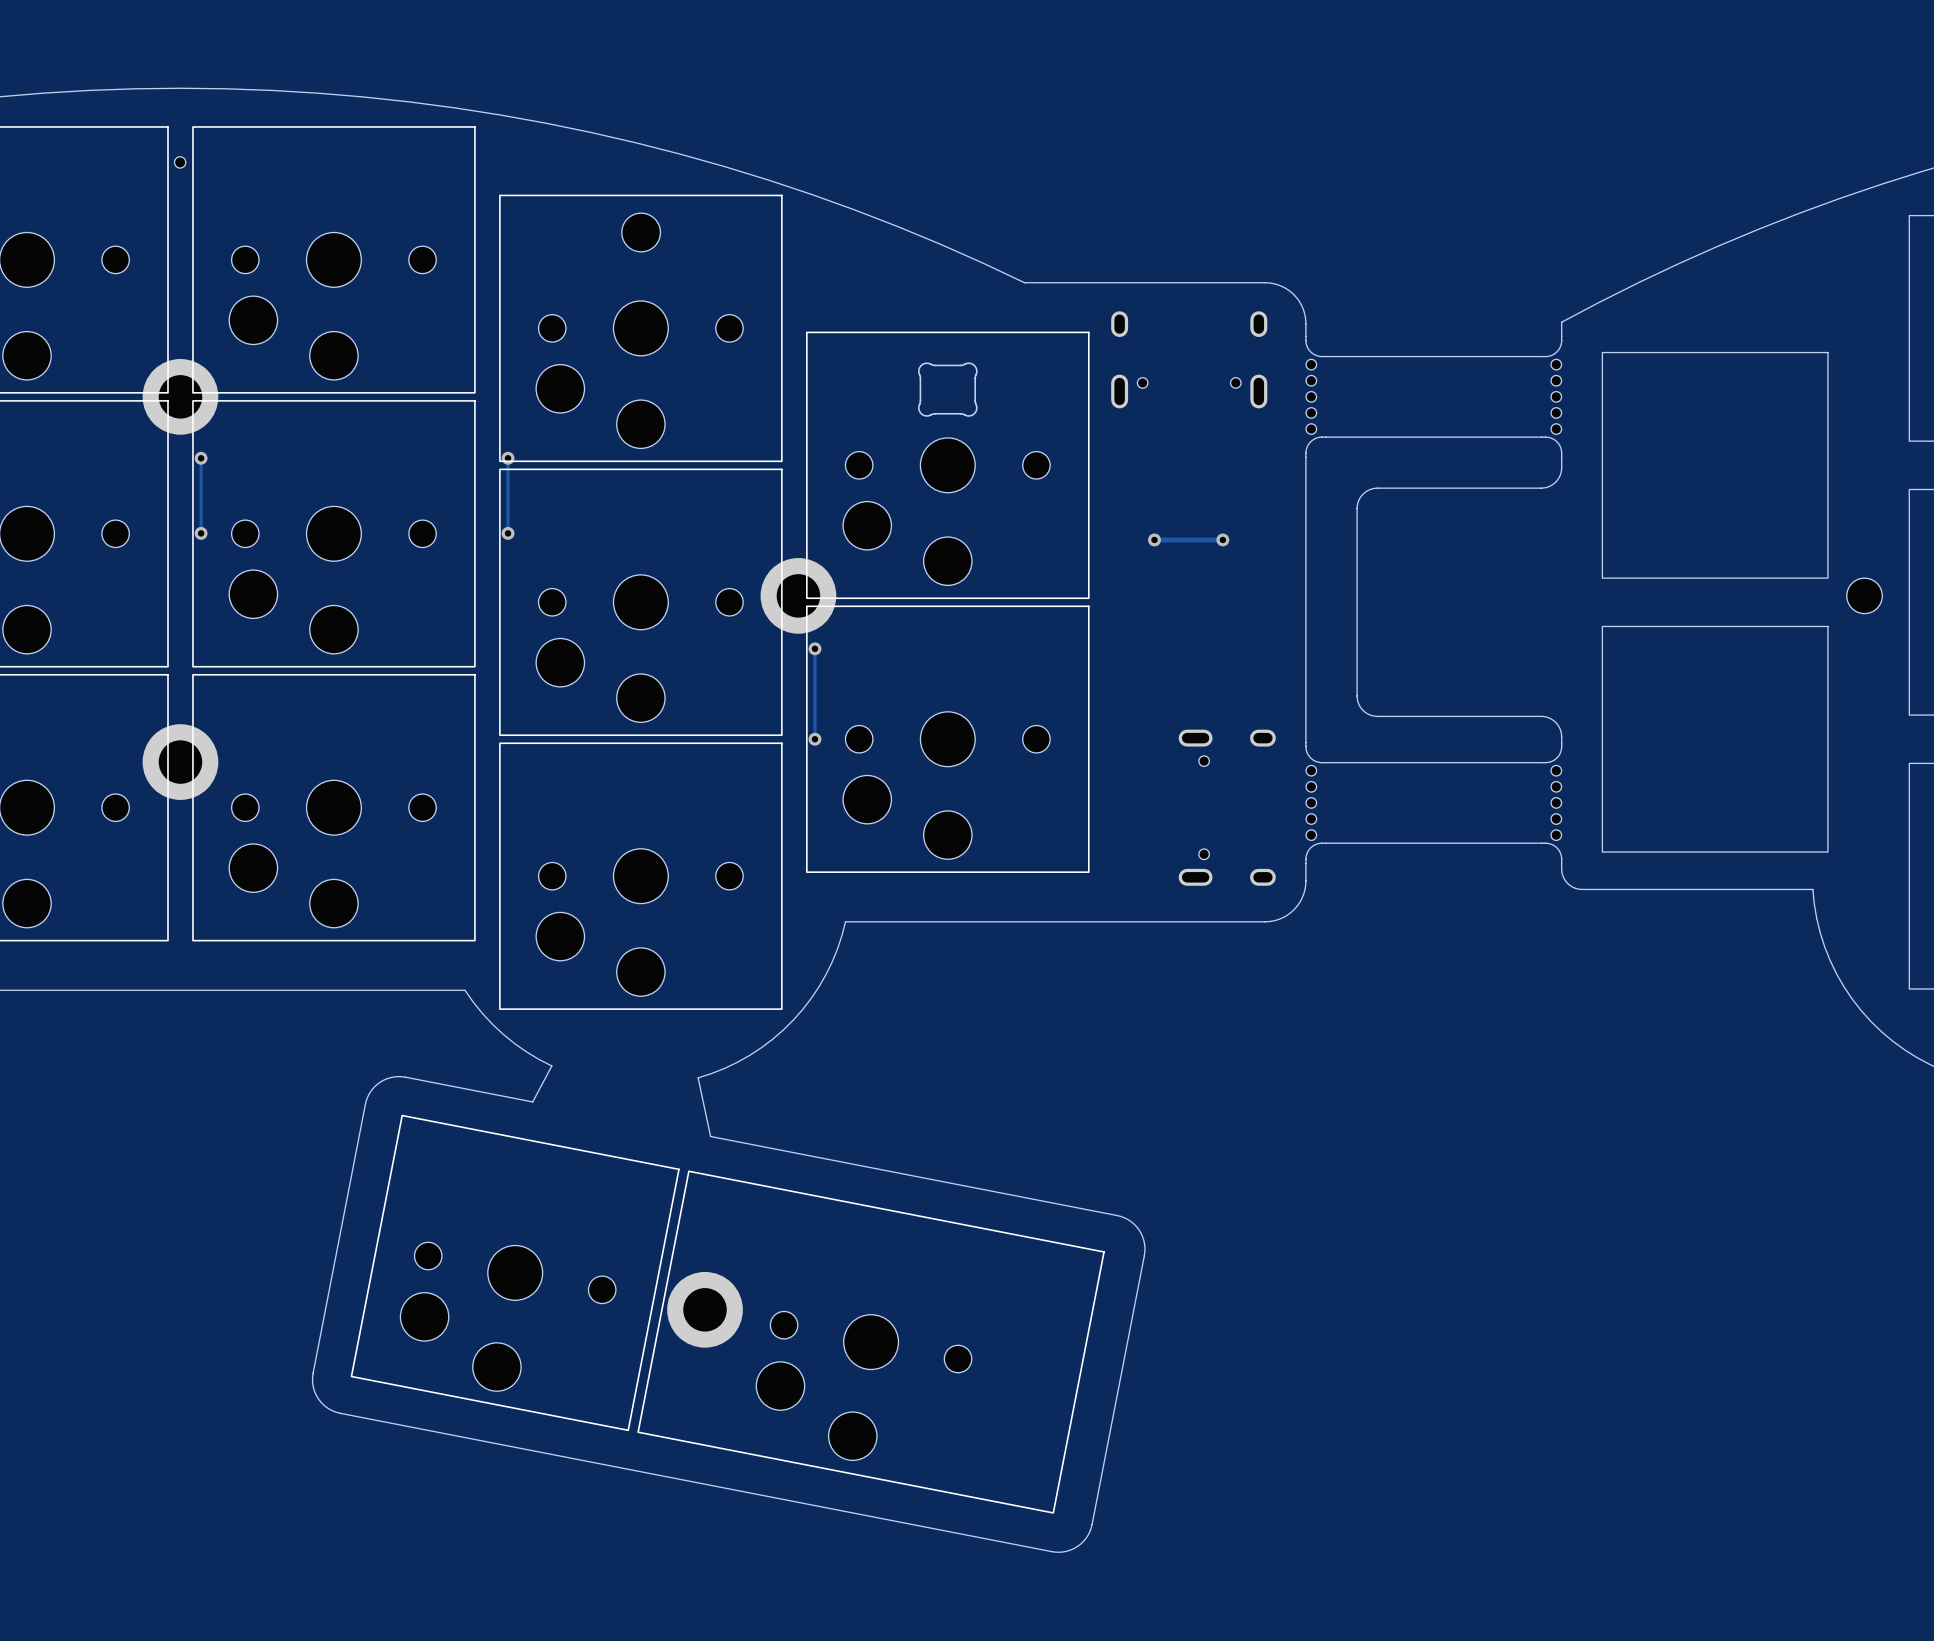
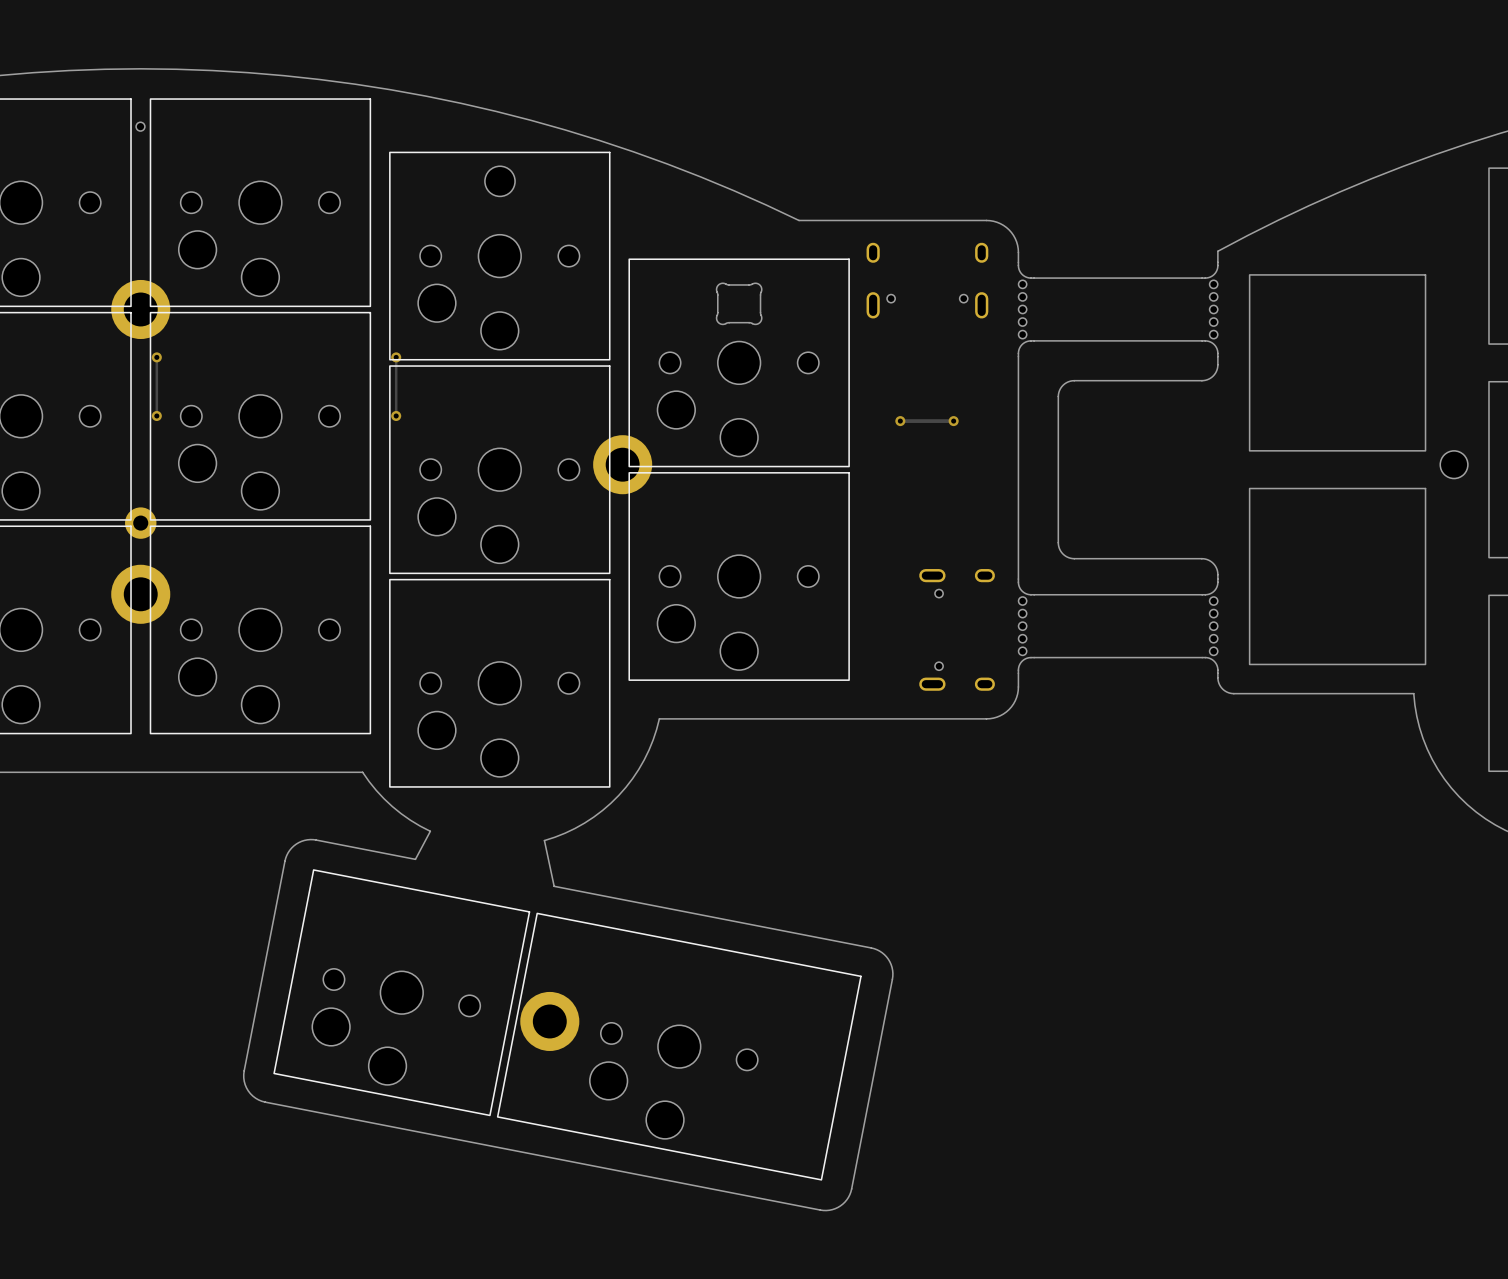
via: (814, 648) -> none
track: (814, 649) (814, 739) -> none
part: none -> (140, 523)
via: (814, 739) -> none

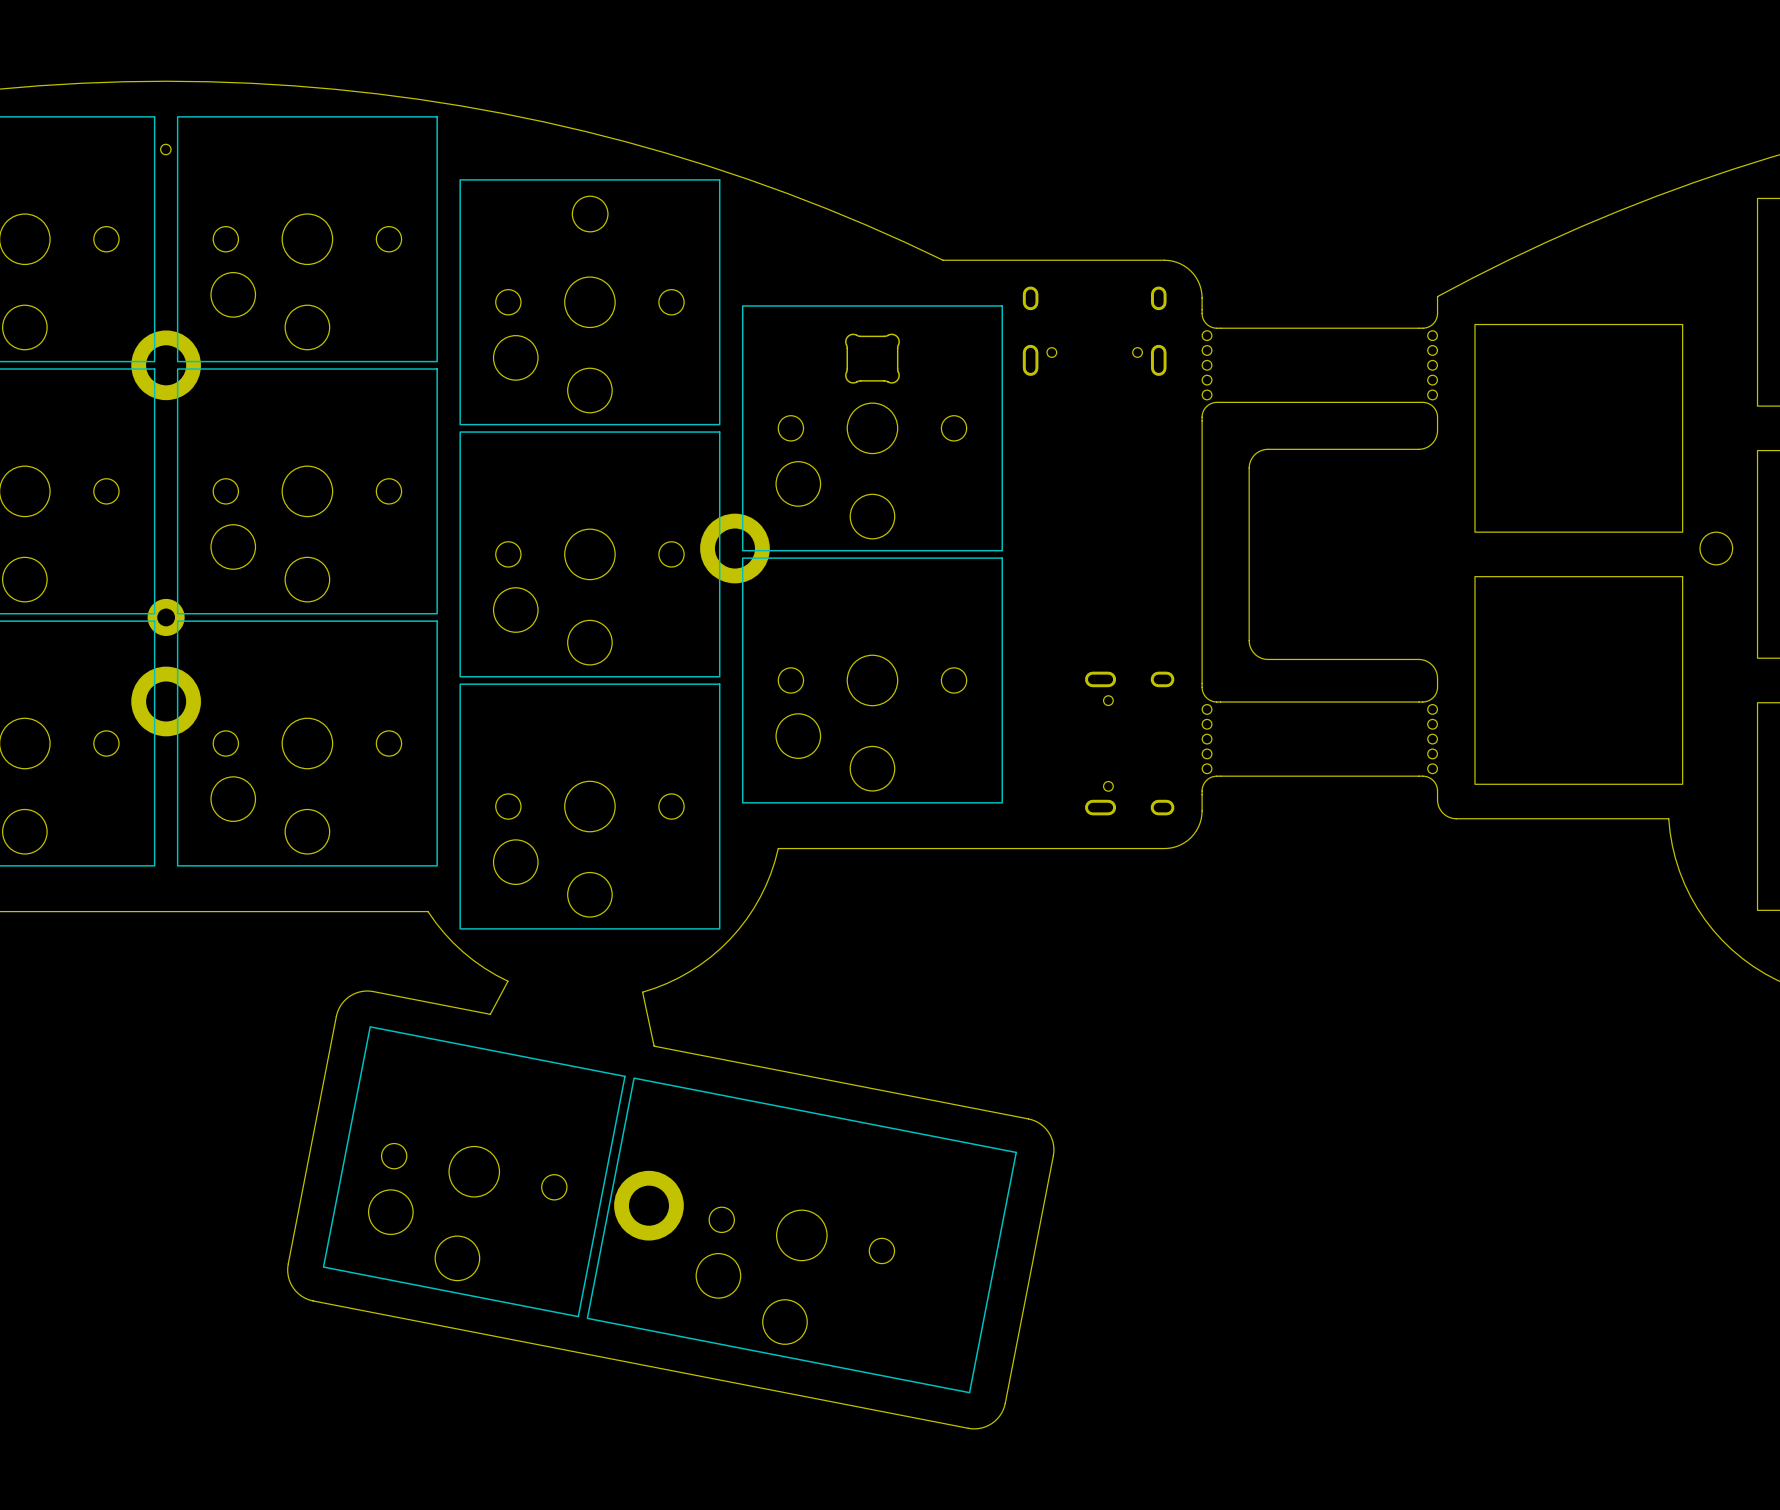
track: (156, 357) (156, 415) -> none
via: (156, 357) -> none
track: (396, 357) (396, 415) -> none
via: (396, 357) -> none
via: (156, 415) -> none
via: (396, 415) -> none
via: (900, 421) -> none
track: (953, 421) (900, 421) -> none
via: (953, 421) -> none

